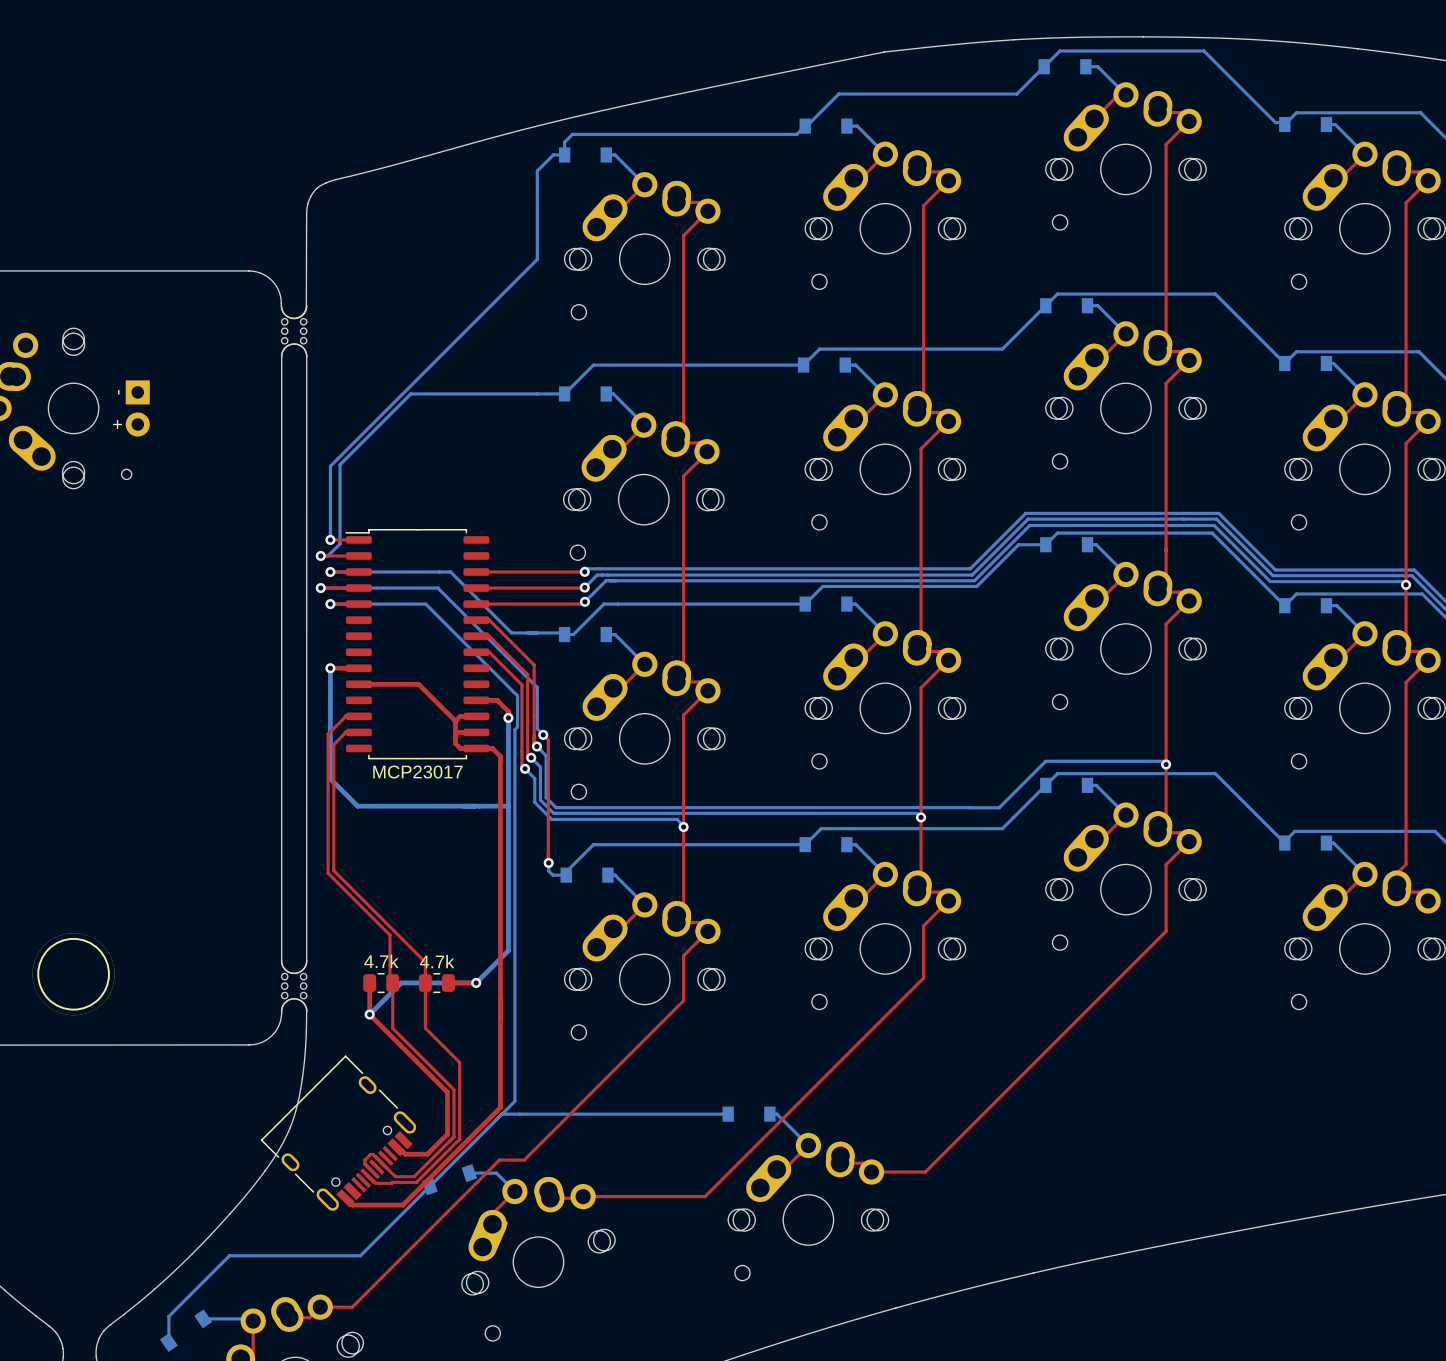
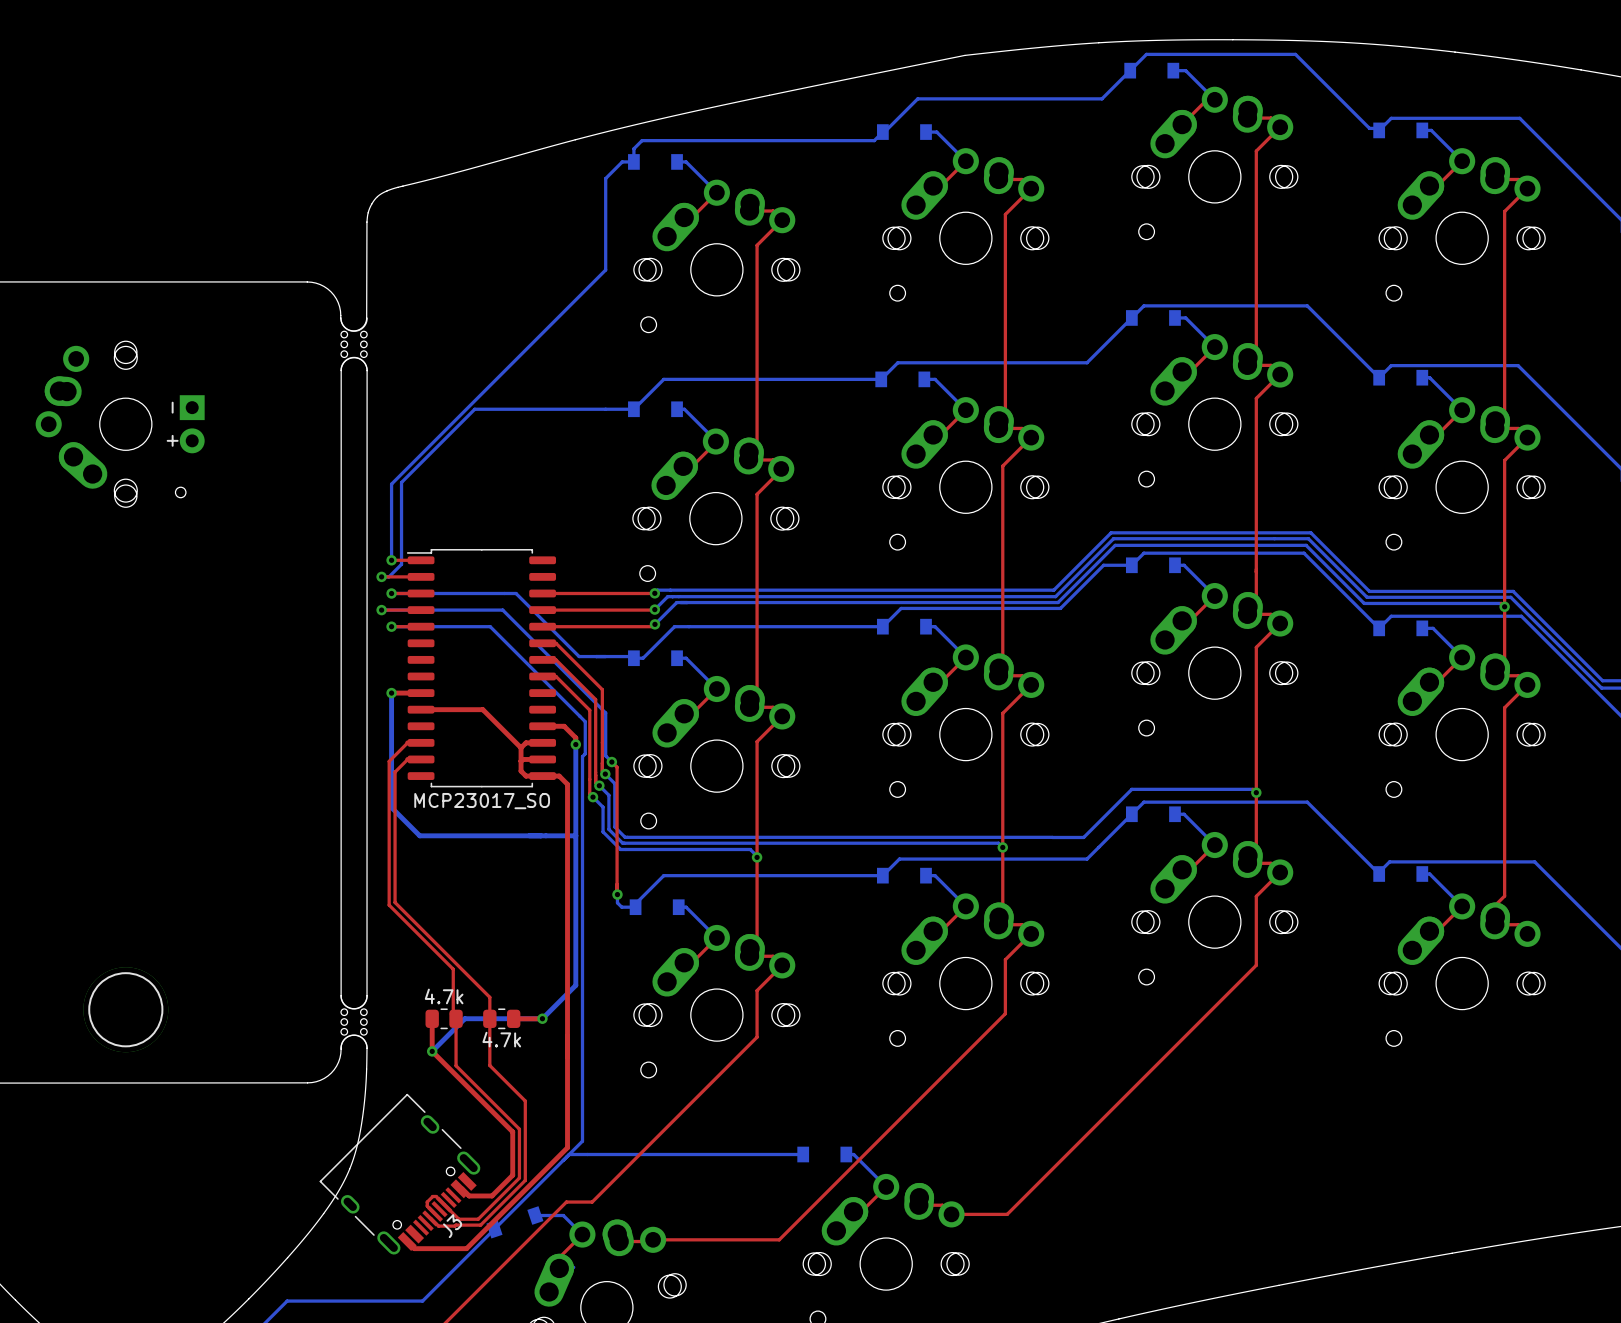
part value: MCP23017 (417, 772) -> MCP23017_SO (482, 801)
part value position: 4.7k (437, 961) -> 4.7k (501, 1039)
J3 name: none -> J3 (452, 1226)

